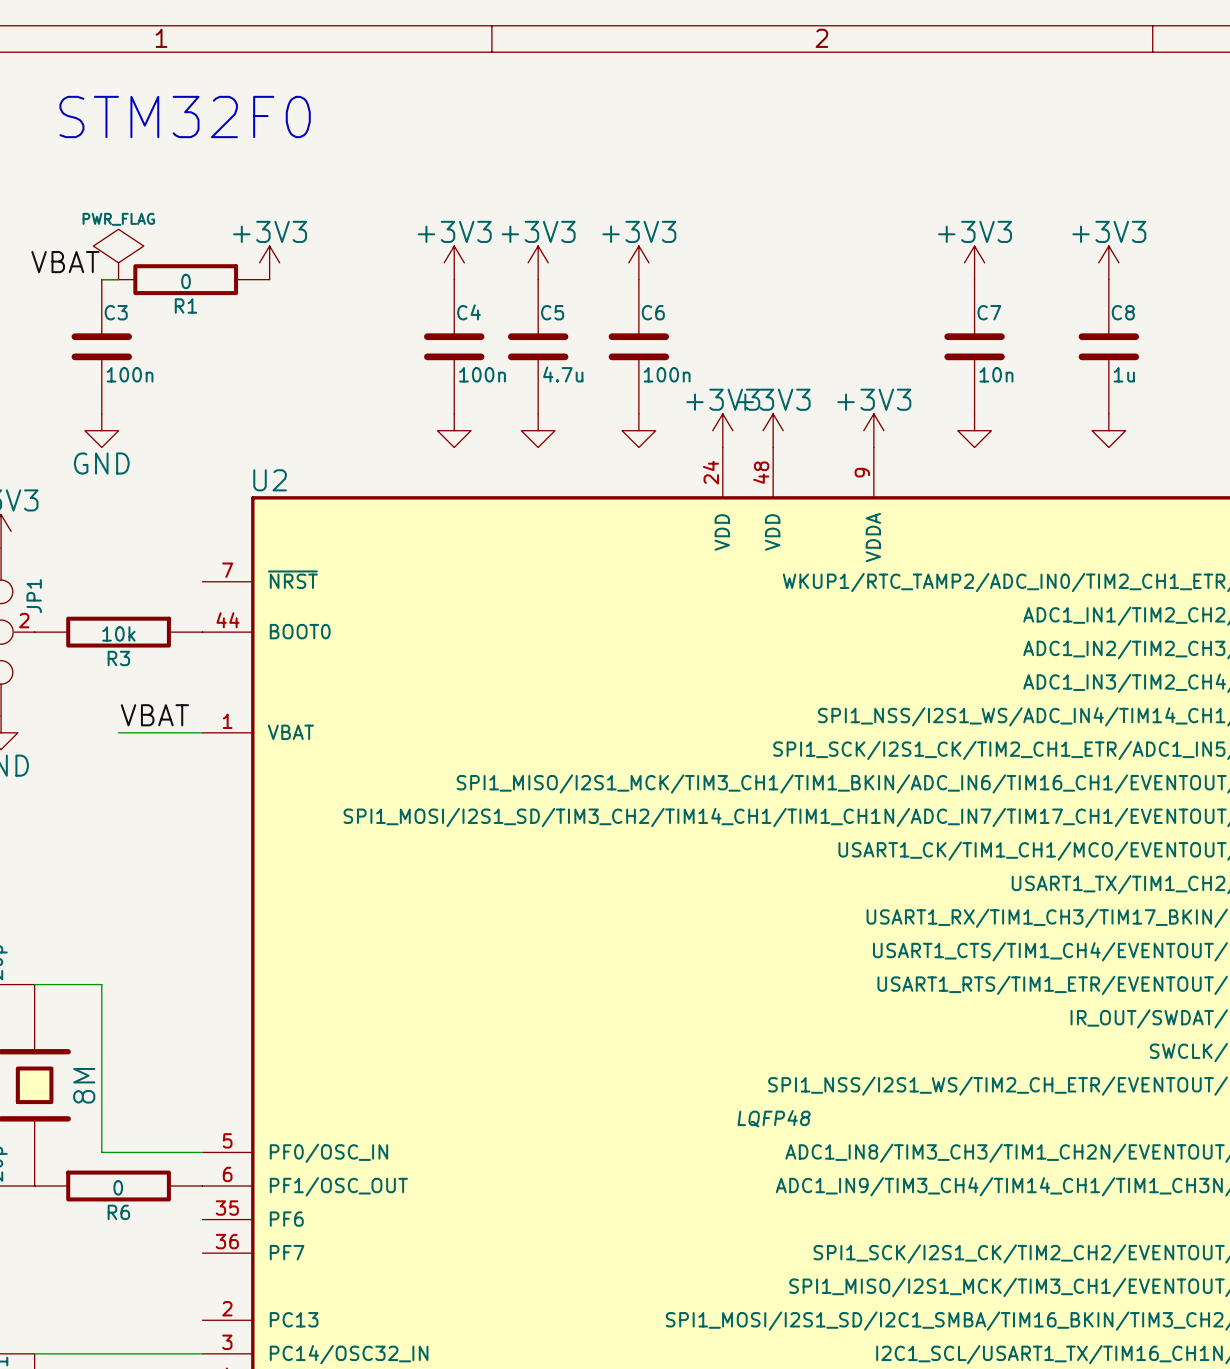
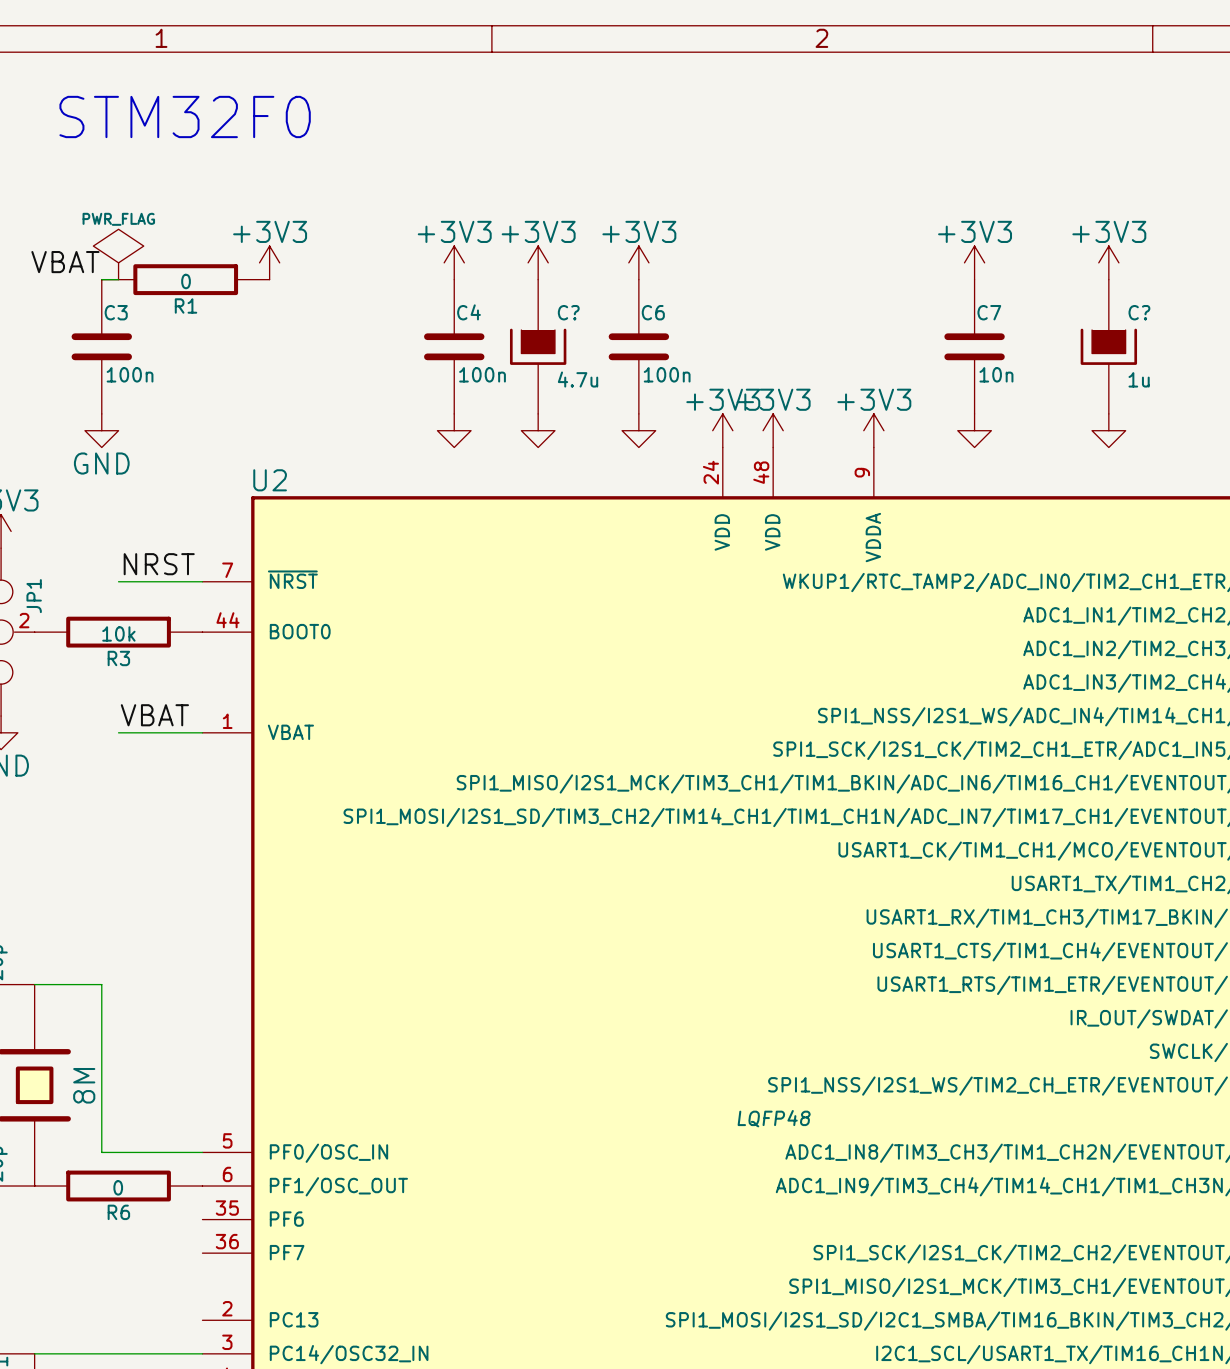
C5: 4.7u (538, 346) -> none
C?: none -> 4.7u (538, 346)
C8: 1u (1108, 346) -> none
C?: none -> 1u (1108, 346)
label: none -> NRST (159, 564)
wire: none -> (118, 581) (202, 581)

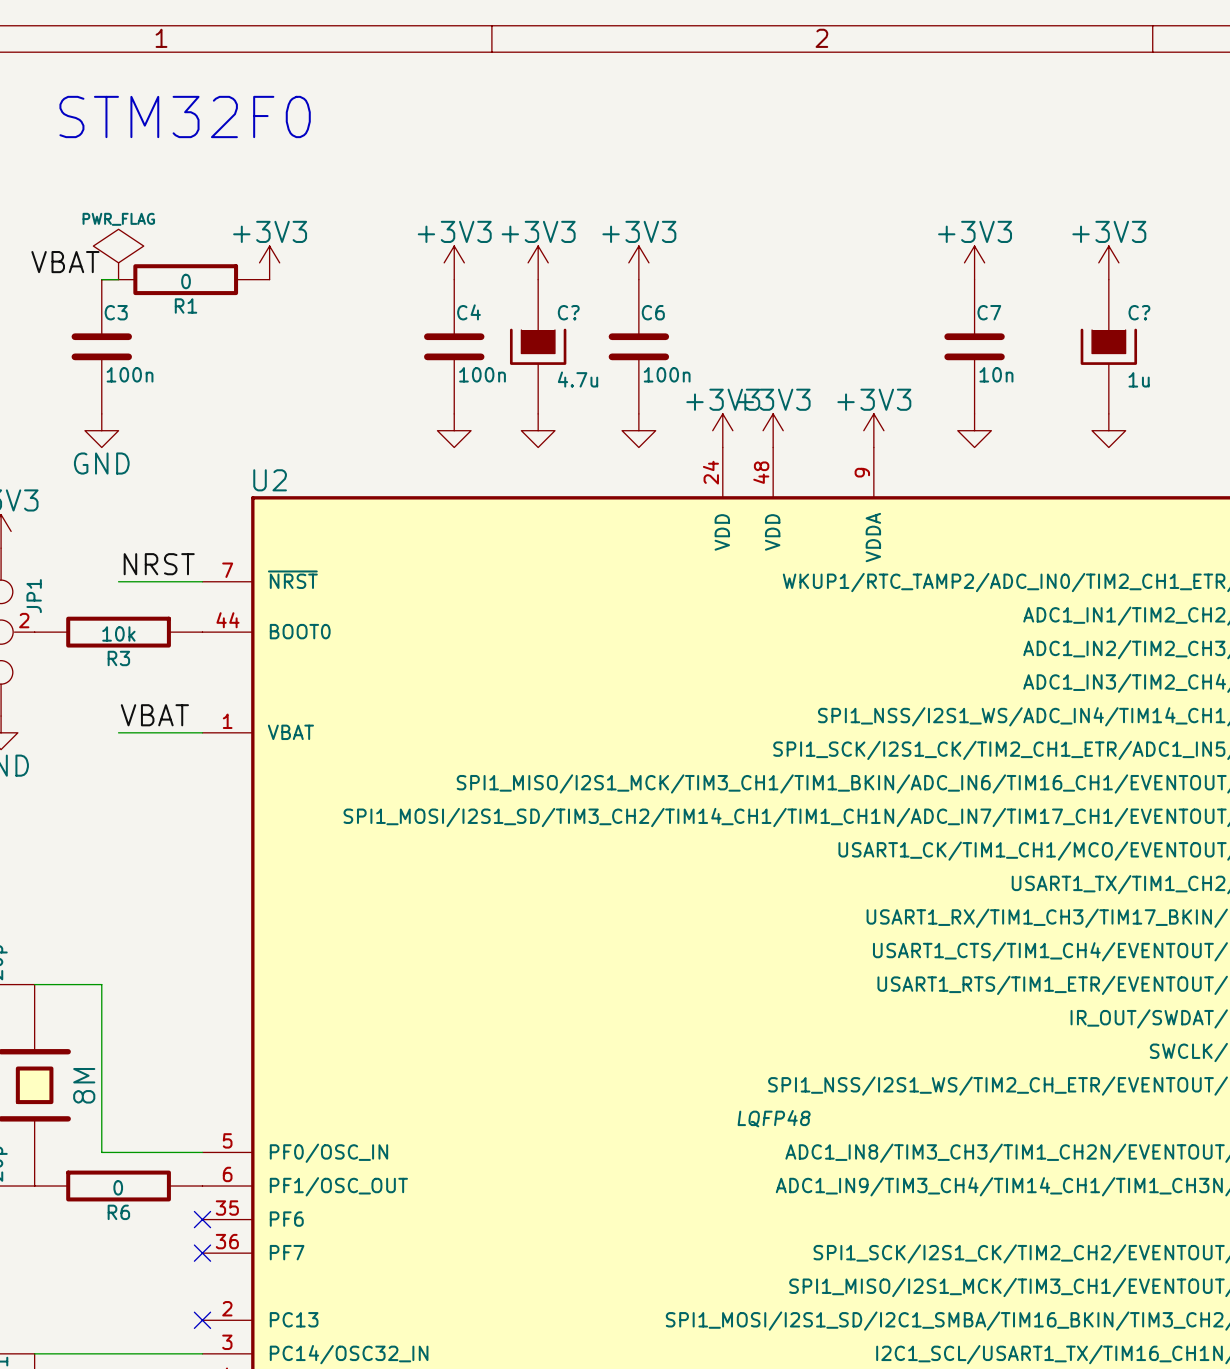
no-connect mark: none -> (202, 1219)
no-connect mark: none -> (202, 1253)
no-connect mark: none -> (202, 1320)

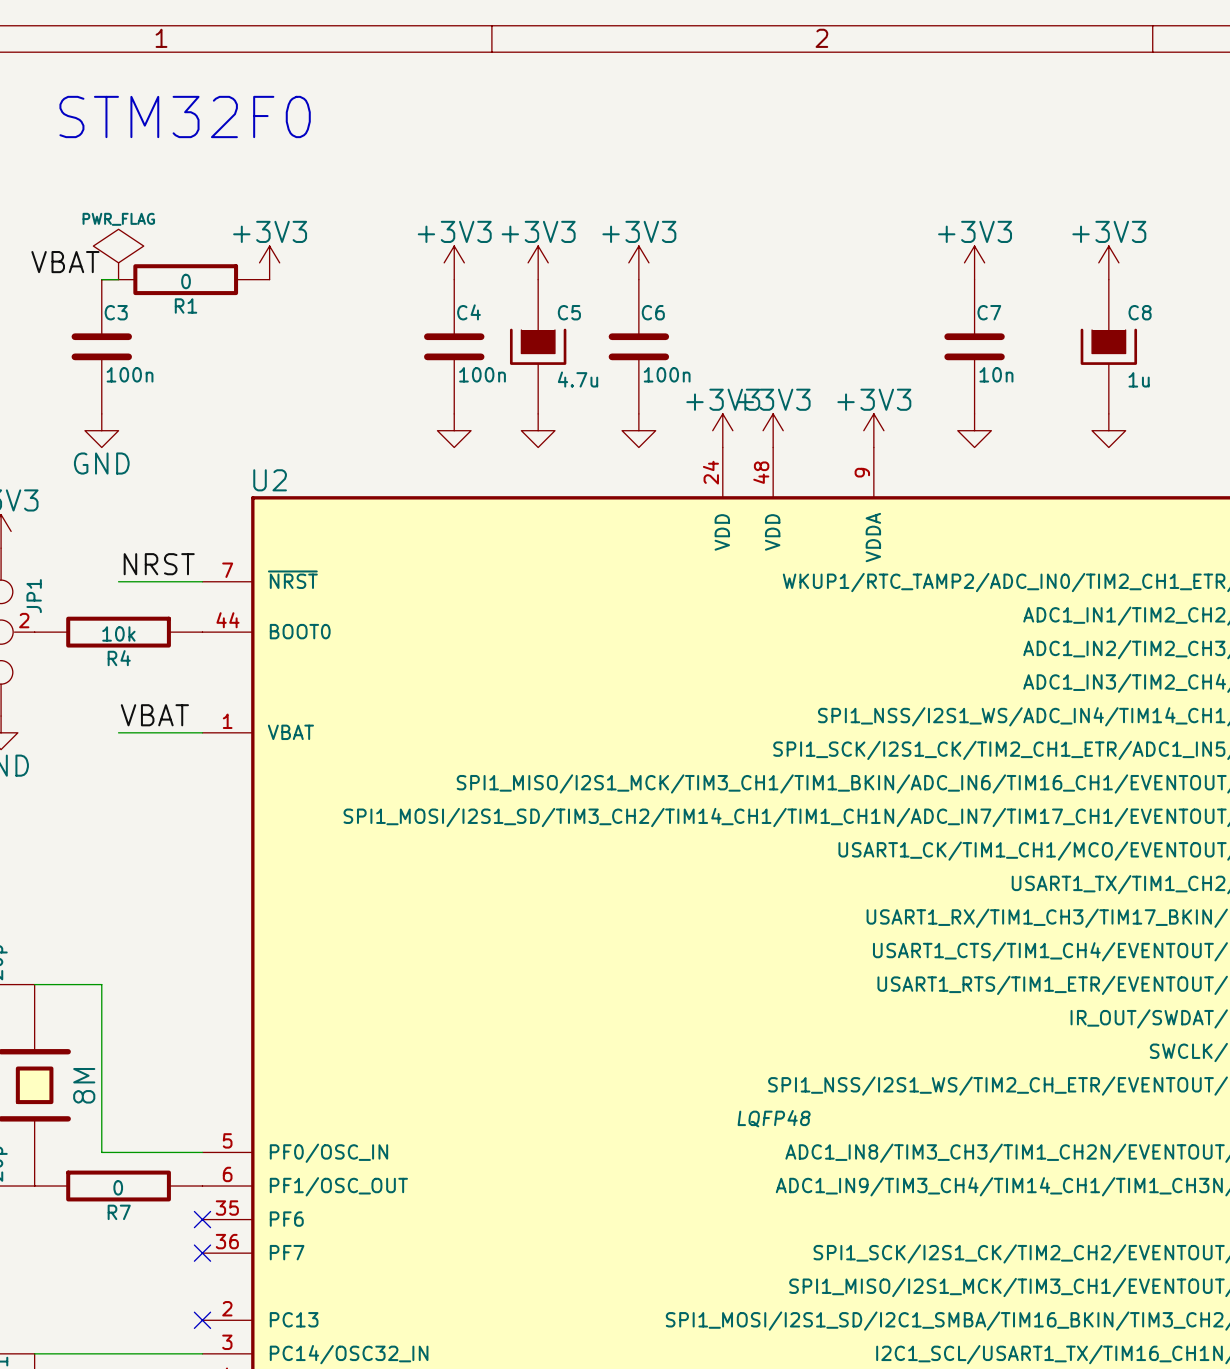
C? name: C? (568, 312) -> C5 (569, 312)
C? name: C? (1139, 312) -> C8 (1140, 312)
R3 name: R3 (118, 658) -> R4 (119, 658)
R6 name: R6 (118, 1212) -> R7 (119, 1212)

